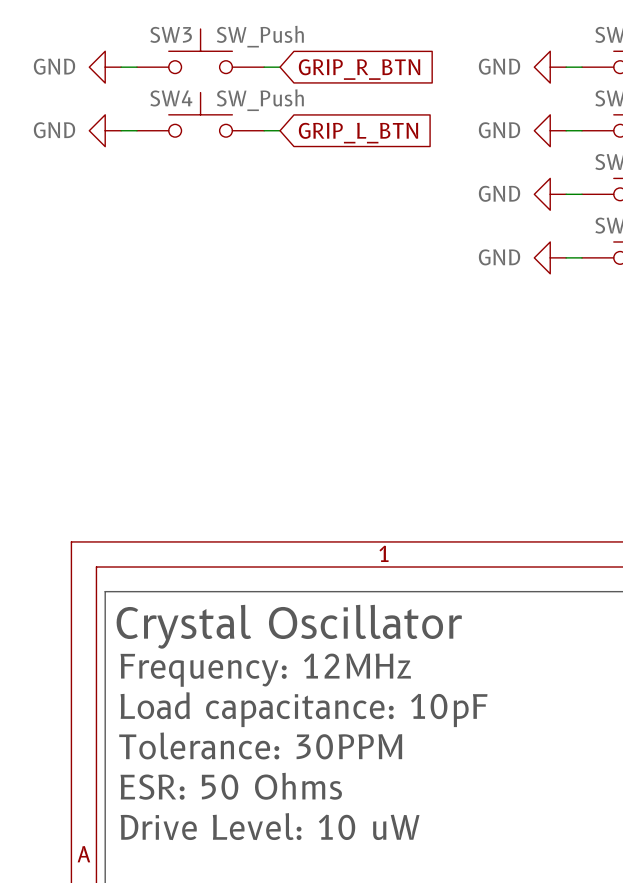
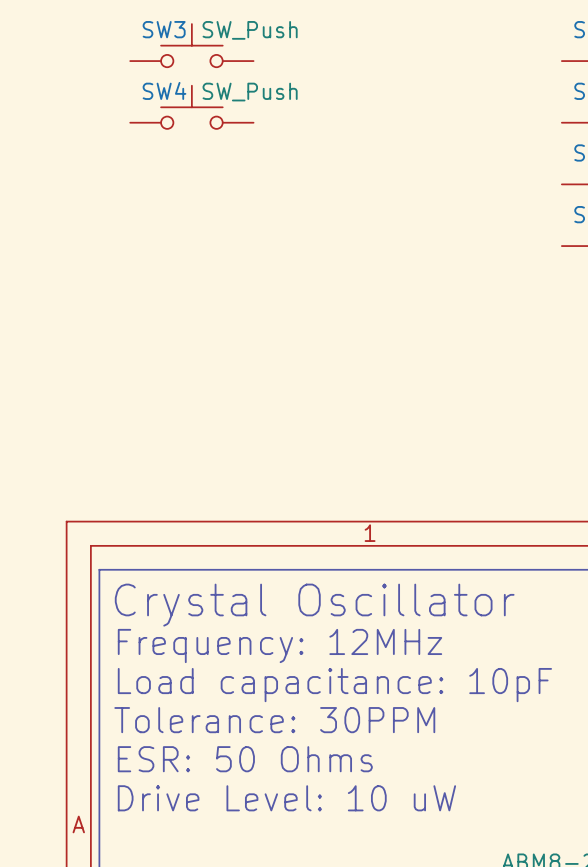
power symbol: GND (105, 67) -> none
wire: (121, 67) (136, 67) -> none
wire: (264, 67) (280, 67) -> none
power symbol: GND (550, 67) -> none
wire: (566, 67) (582, 67) -> none
global label: GRIP_R_BTN (359, 69) -> none
power symbol: GND (105, 130) -> none
wire: (121, 130) (136, 130) -> none
wire: (264, 130) (280, 130) -> none
power symbol: GND (550, 130) -> none
wire: (566, 130) (582, 130) -> none
global label: GRIP_L_BTN (358, 133) -> none
power symbol: GND (550, 194) -> none
wire: (566, 194) (582, 194) -> none
power symbol: GND (550, 257) -> none
wire: (566, 257) (582, 257) -> none

